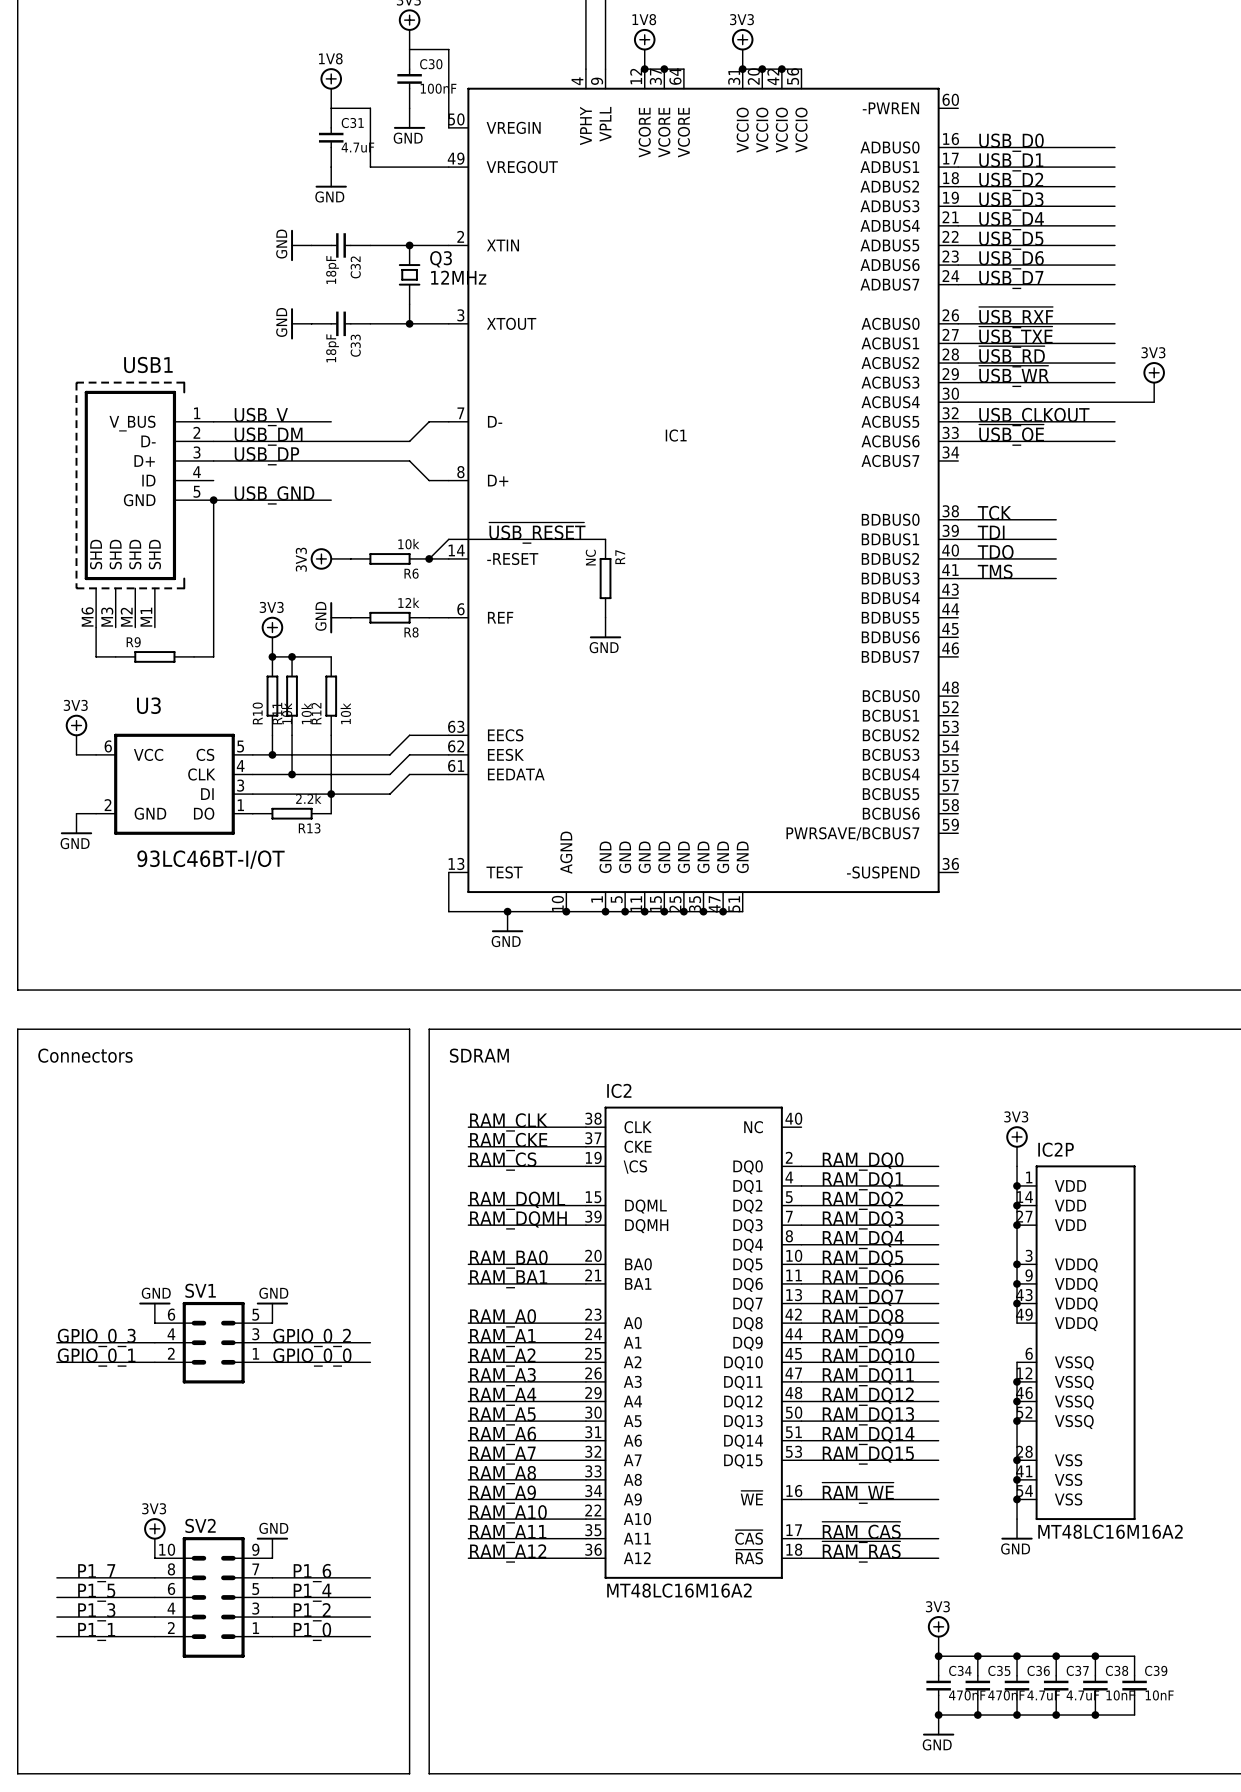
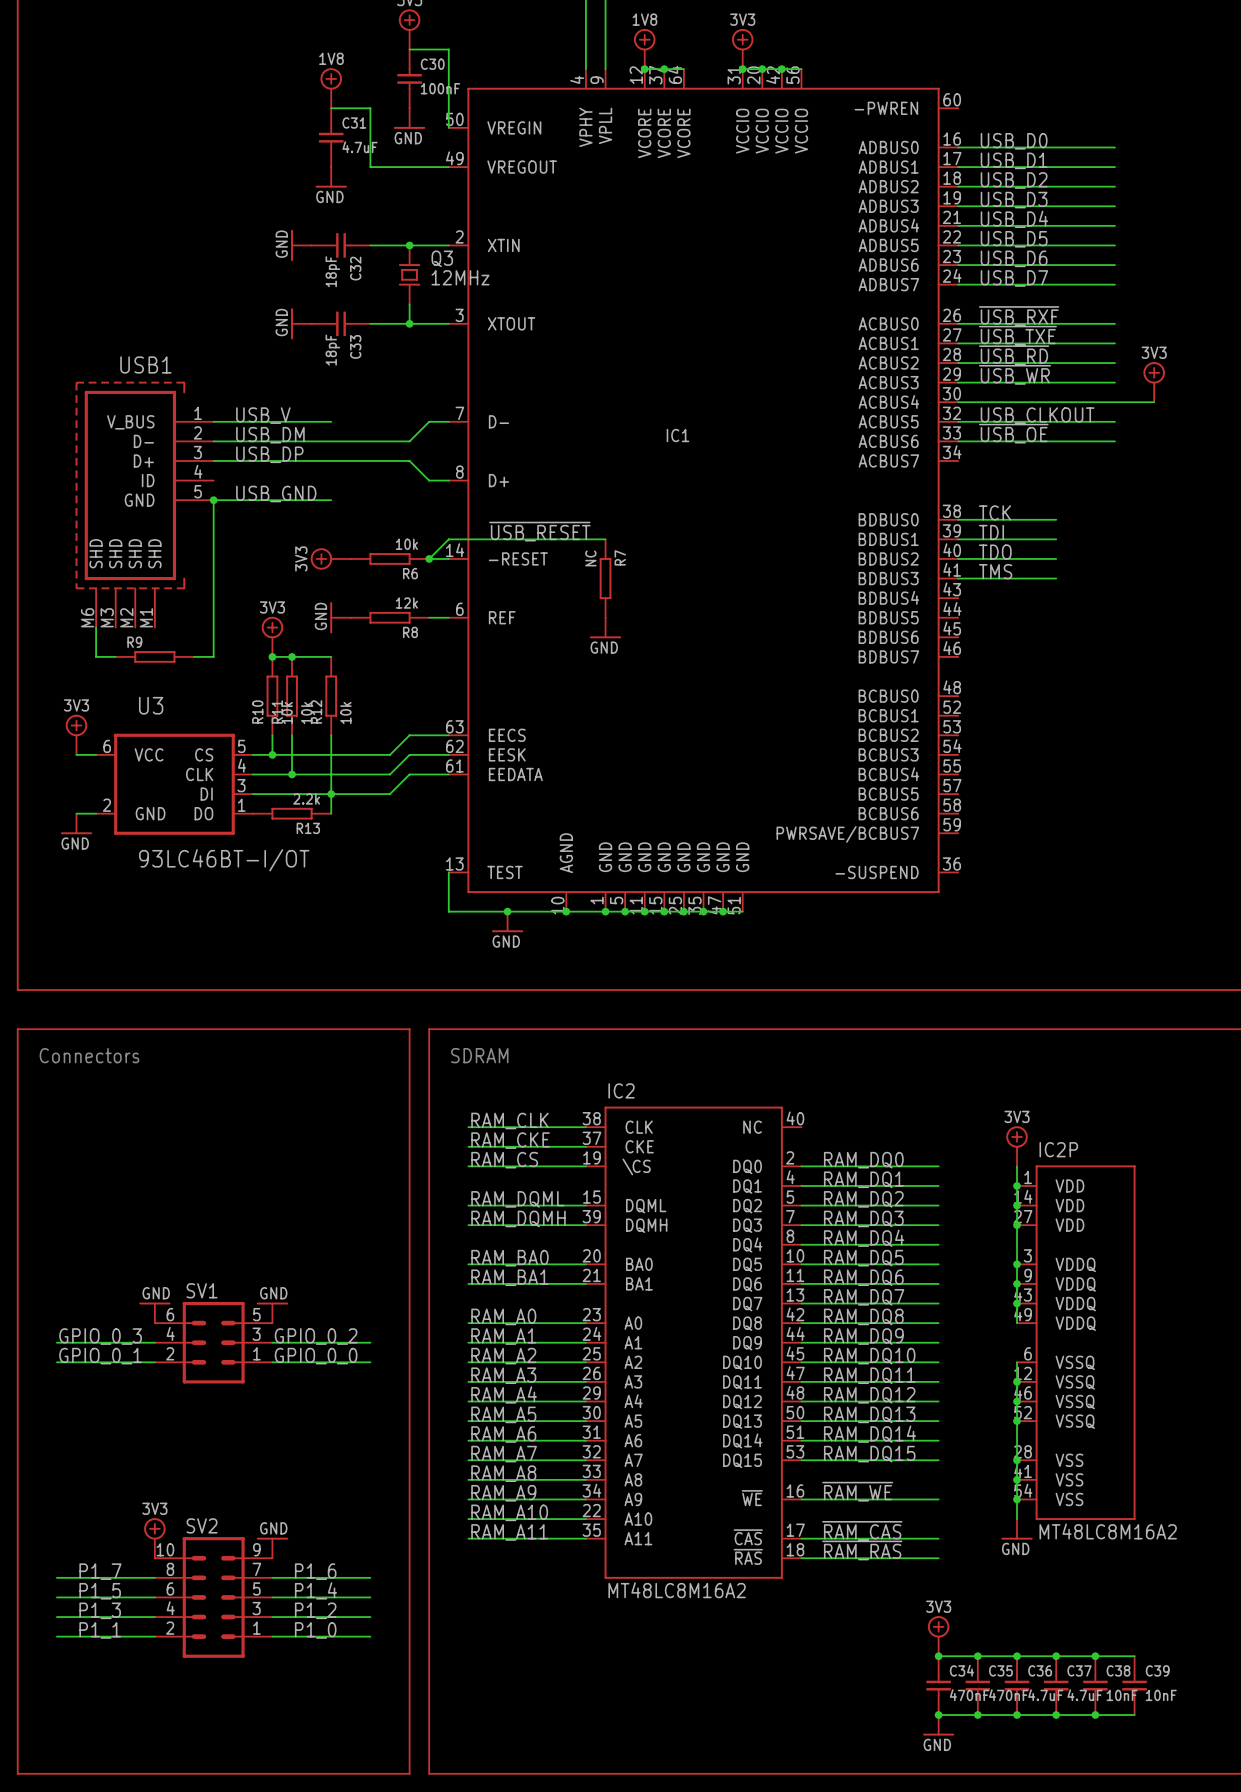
IC2 symbol: [585, 1106, 802, 1579] -> [585, 1106, 802, 1579]
IC2P value: MT48LC16M16A2 (1110, 1531) -> MT48LC8M16A2 (1108, 1531)
label: RAM_A12 (508, 1553) -> none
wire: (468, 1558) (585, 1558) -> none
IC2 value: MT48LC16M16A2 (679, 1590) -> MT48LC8M16A2 (677, 1590)

